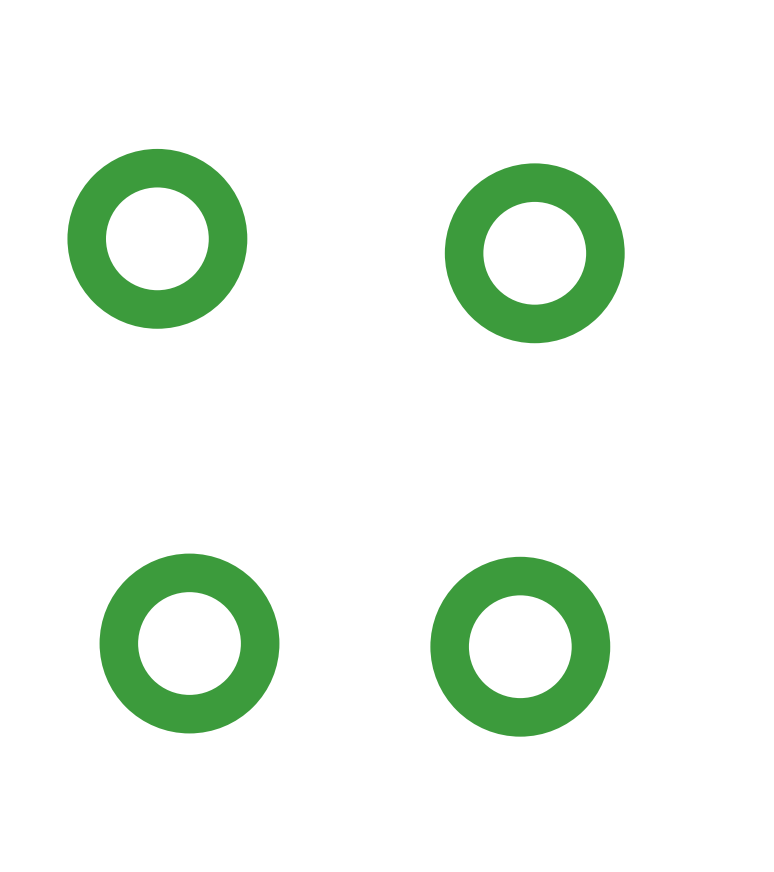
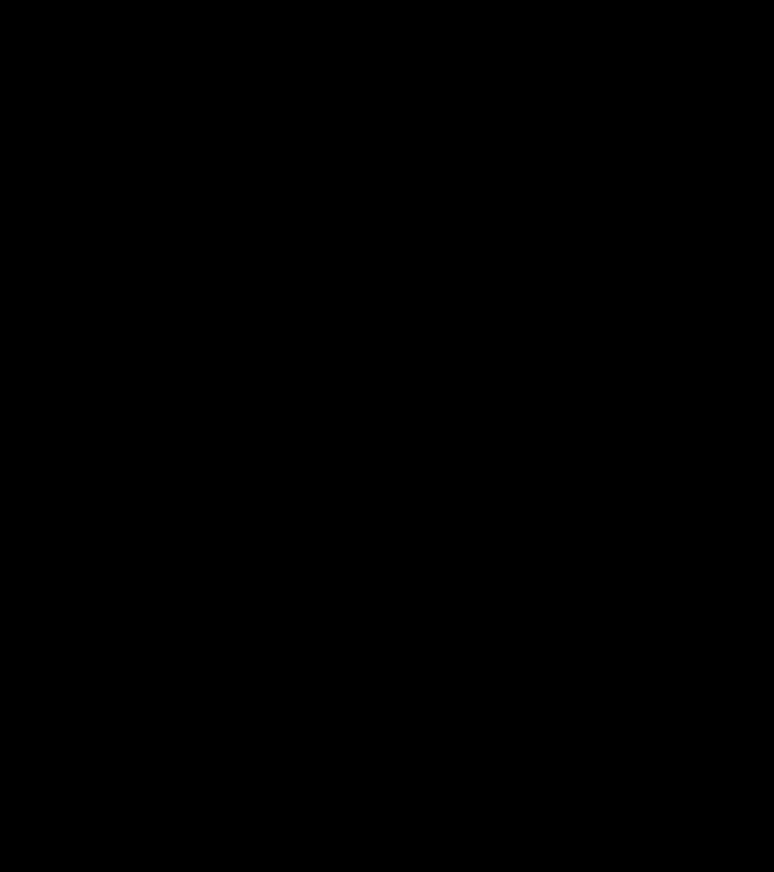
part: (157, 238) -> none
part: (534, 253) -> none
part: (189, 643) -> none
part: (520, 646) -> none

